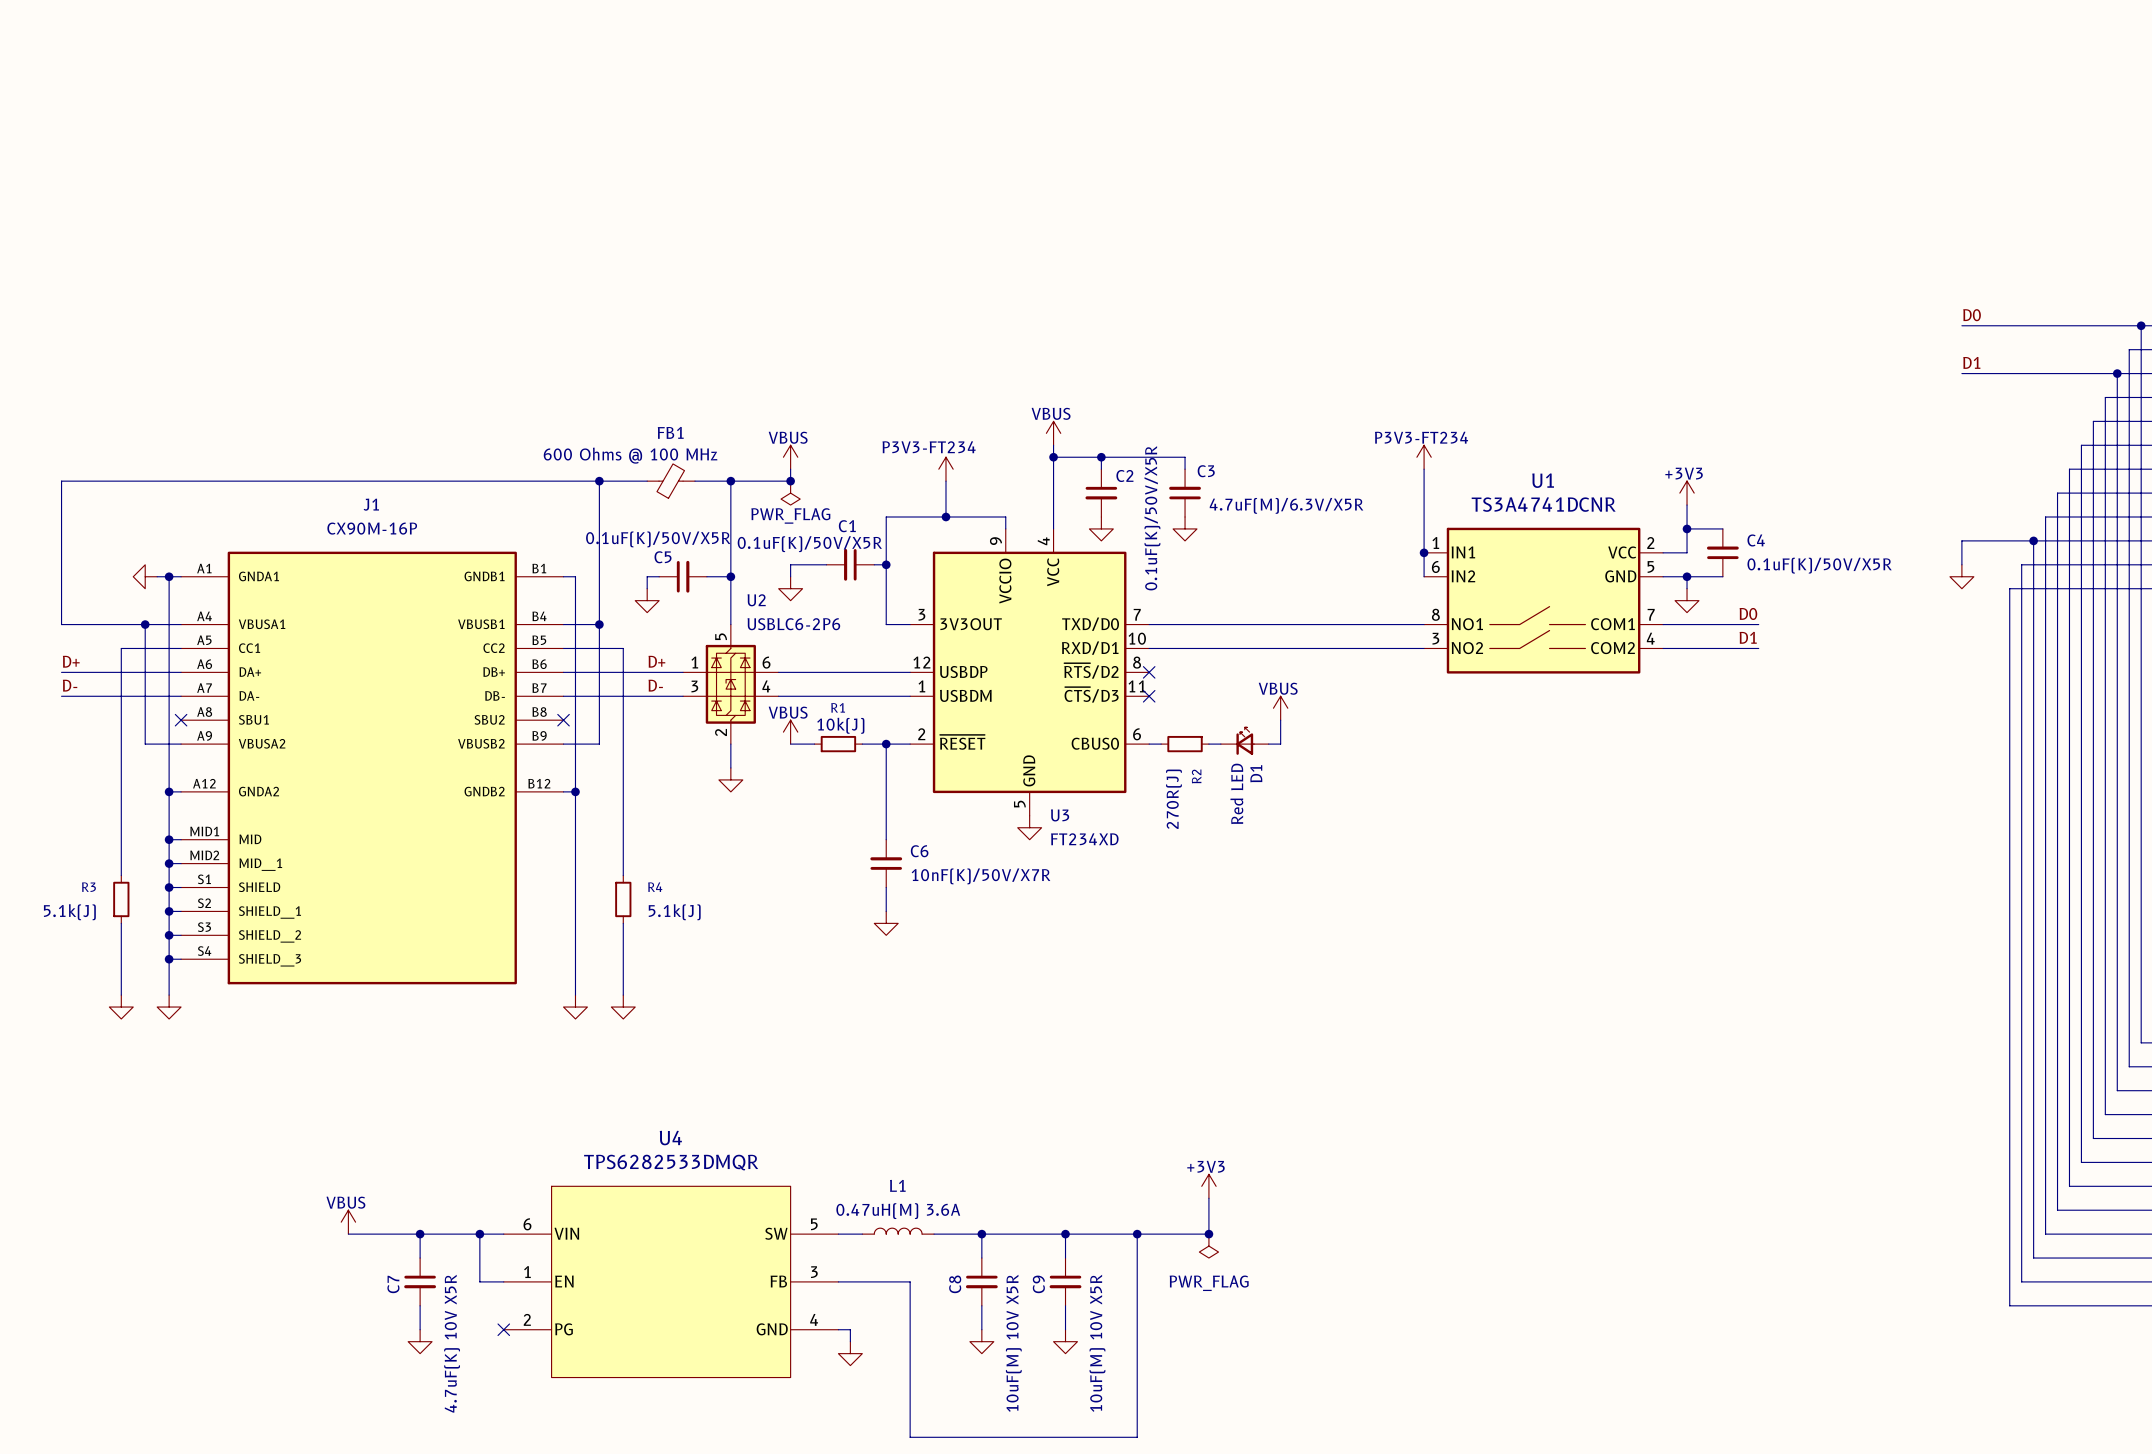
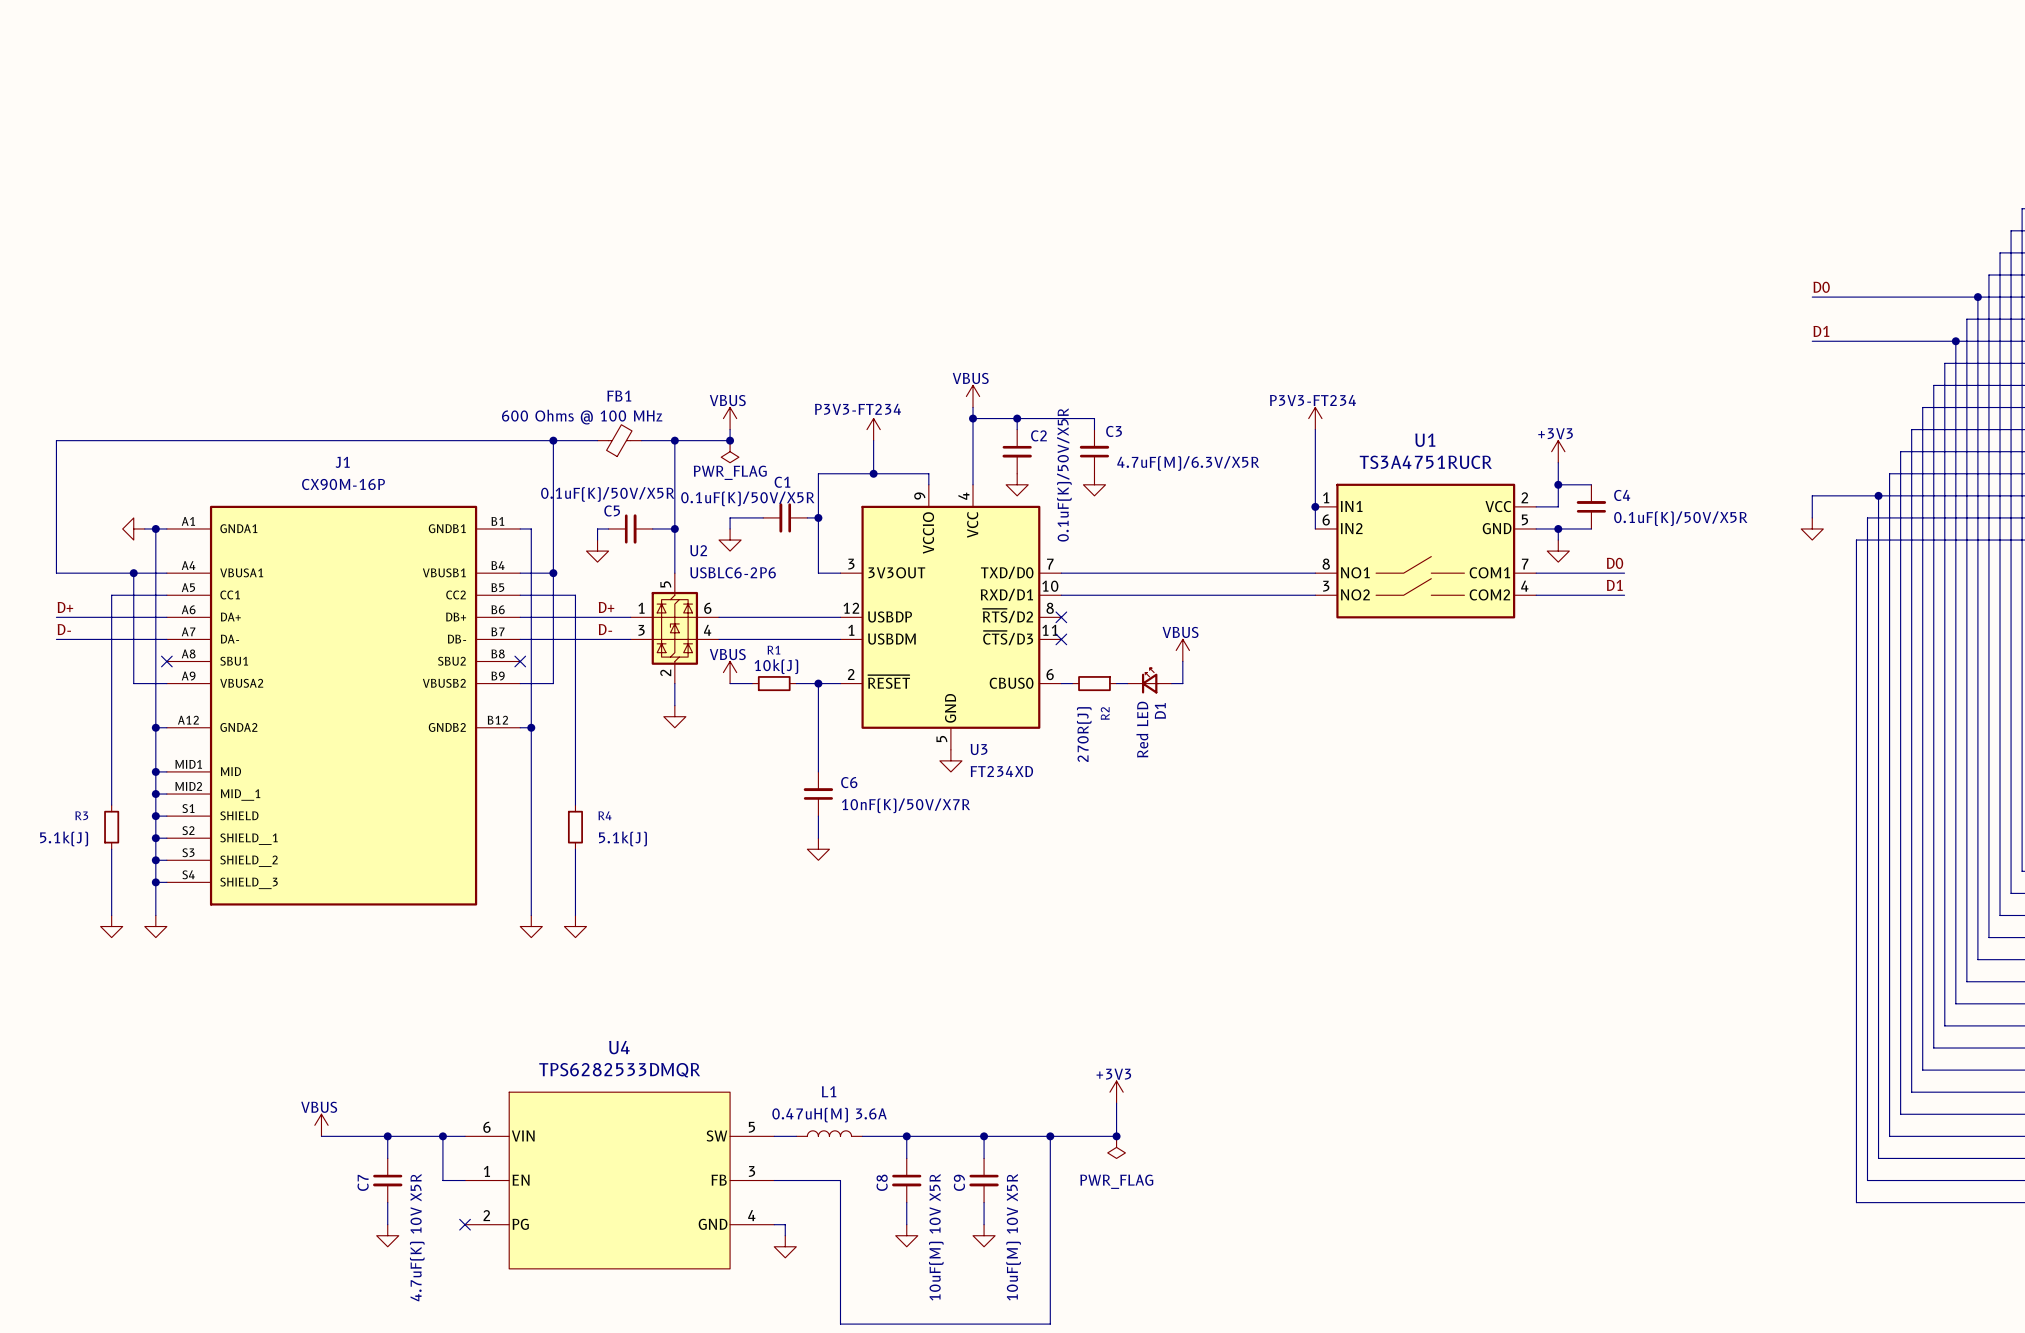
U1 value: TS3A4741DCNR (1543, 504) -> TS3A4751RUCR (1425, 462)

